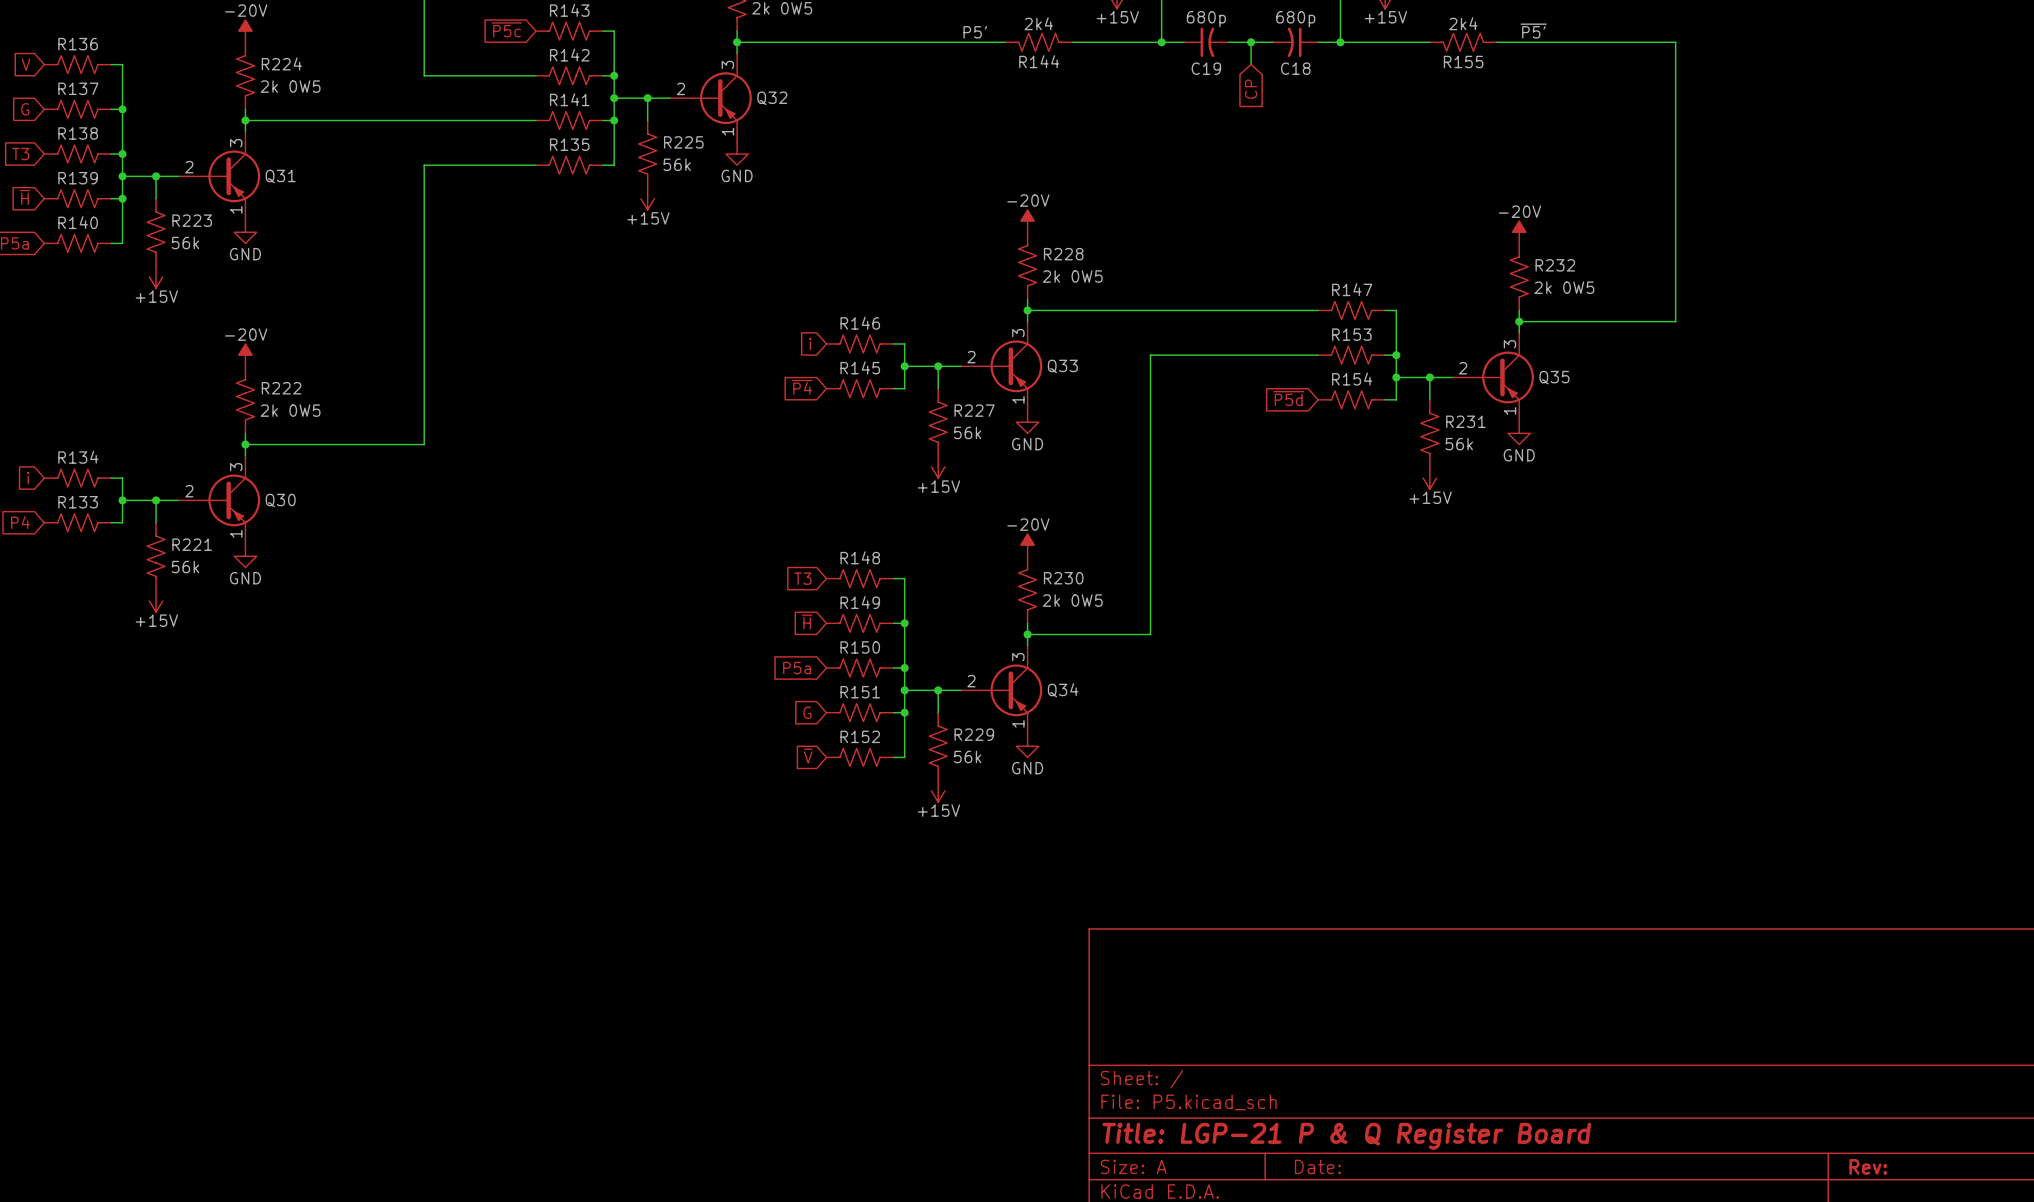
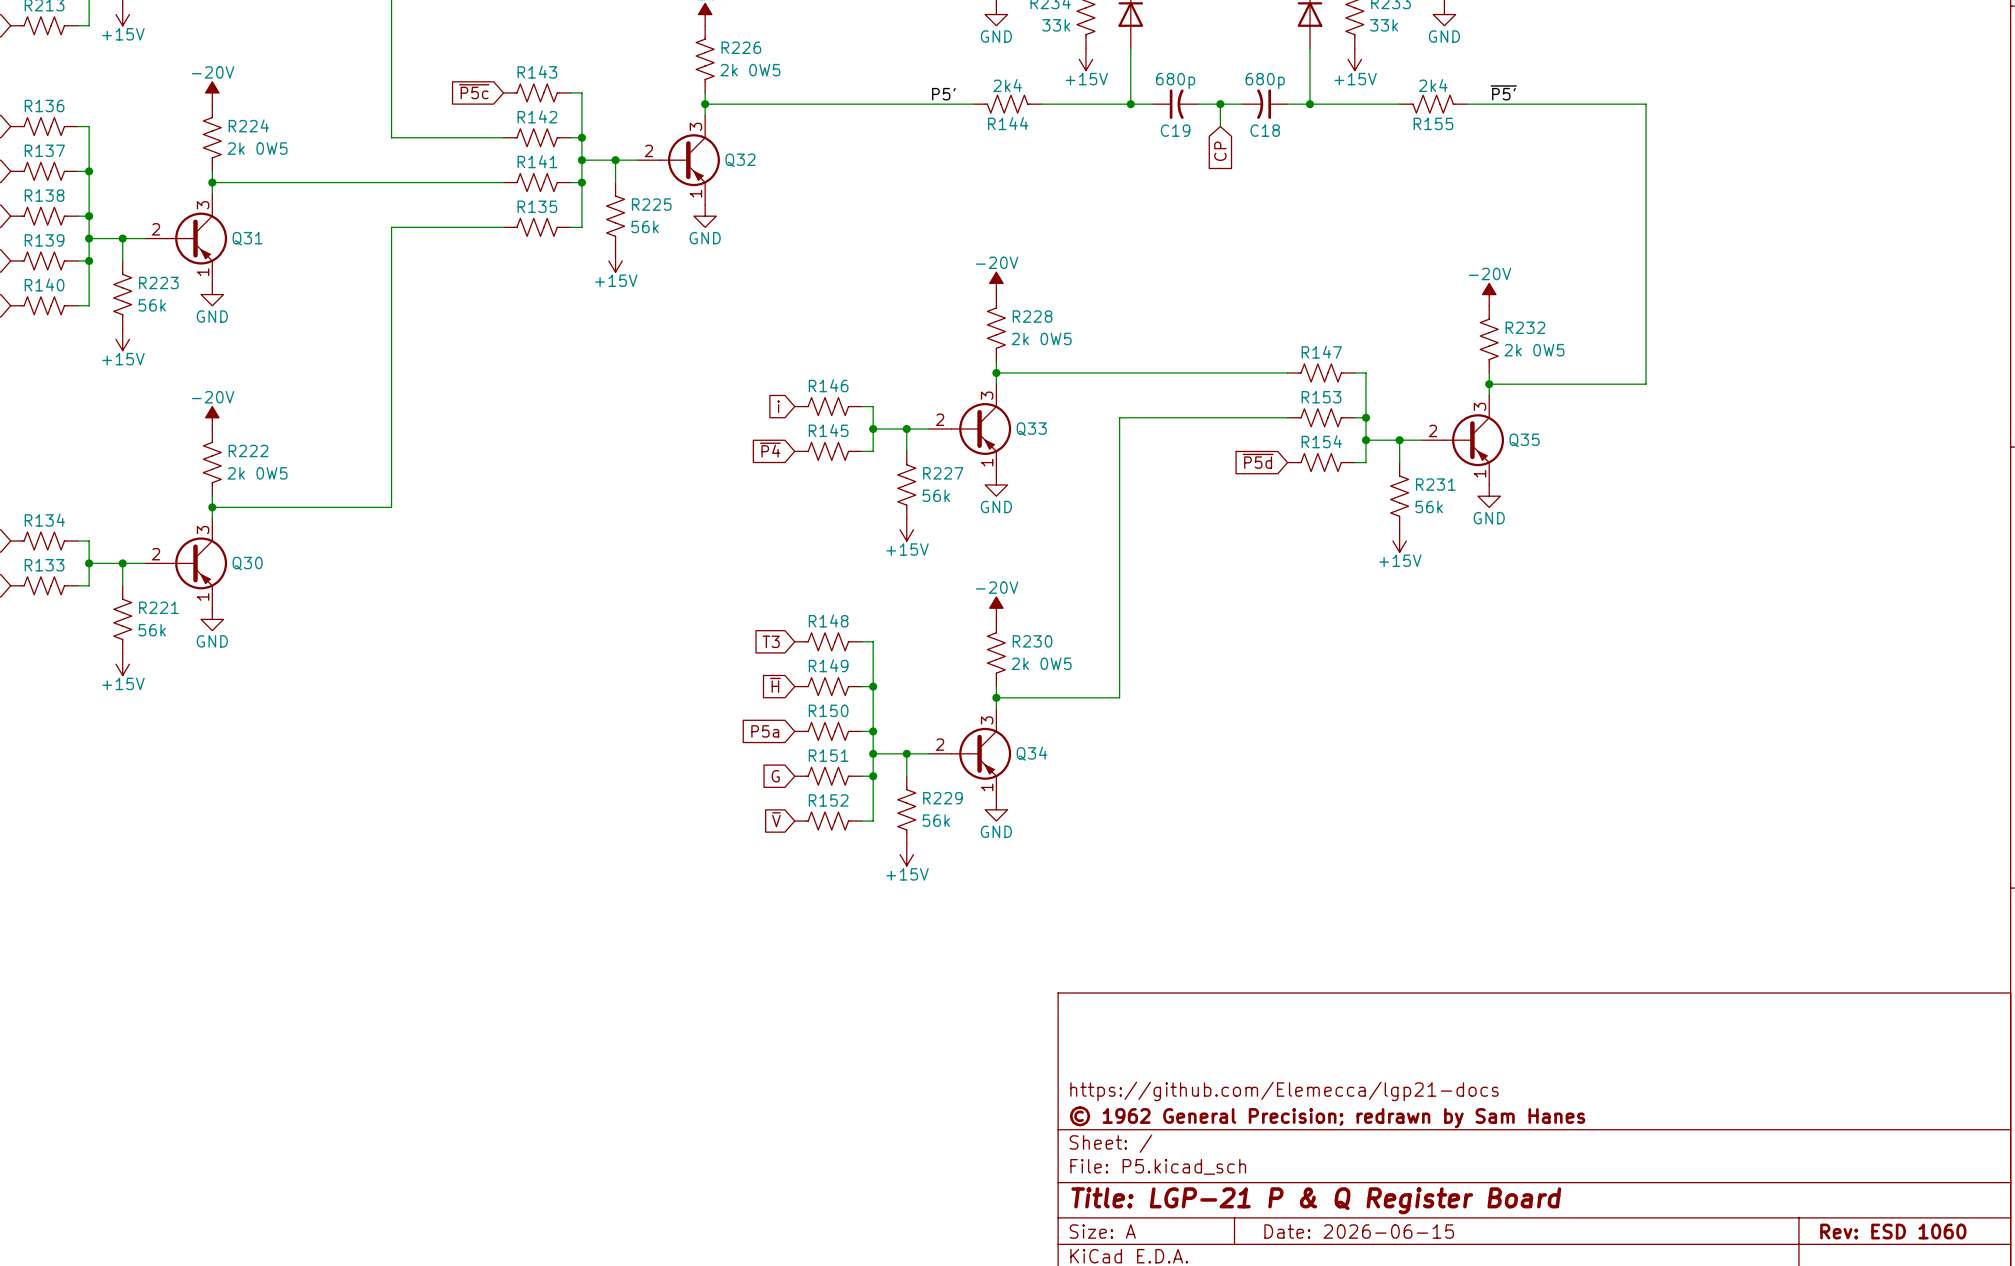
title block: none -> https://github.com/Elemecca/lgp21-docs (1284, 1091)
title block: none -> © 1962 General Precision; redrawn by Sam Hanes (1327, 1117)
title block: Date: (1317, 1166) -> Date: 2026-06-15 (1359, 1231)
title block: Rev: (1868, 1166) -> Rev: ESD 1060 (1893, 1231)

